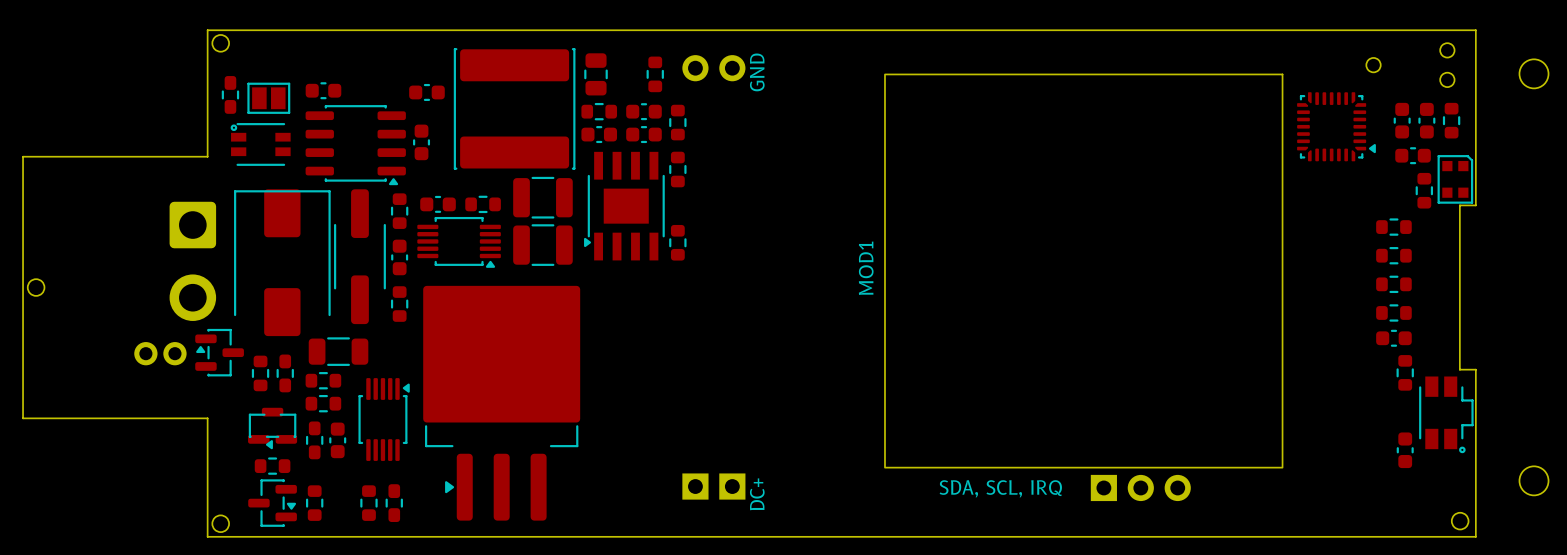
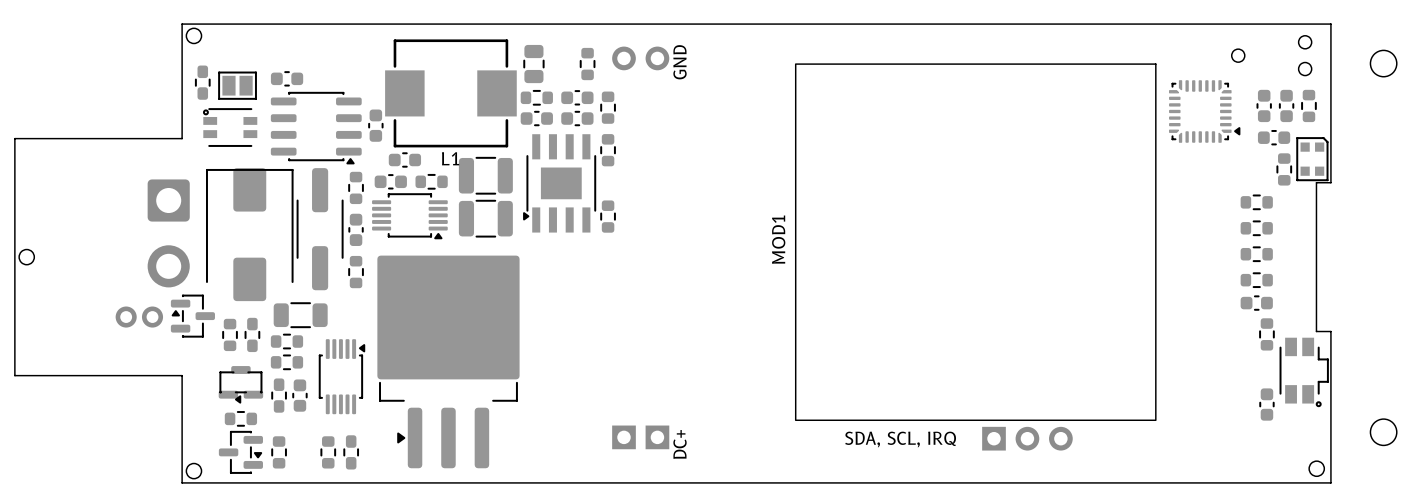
part position: (426, 92) -> (404, 159)
L1: none -> (450, 93)
part: (514, 108) -> none

